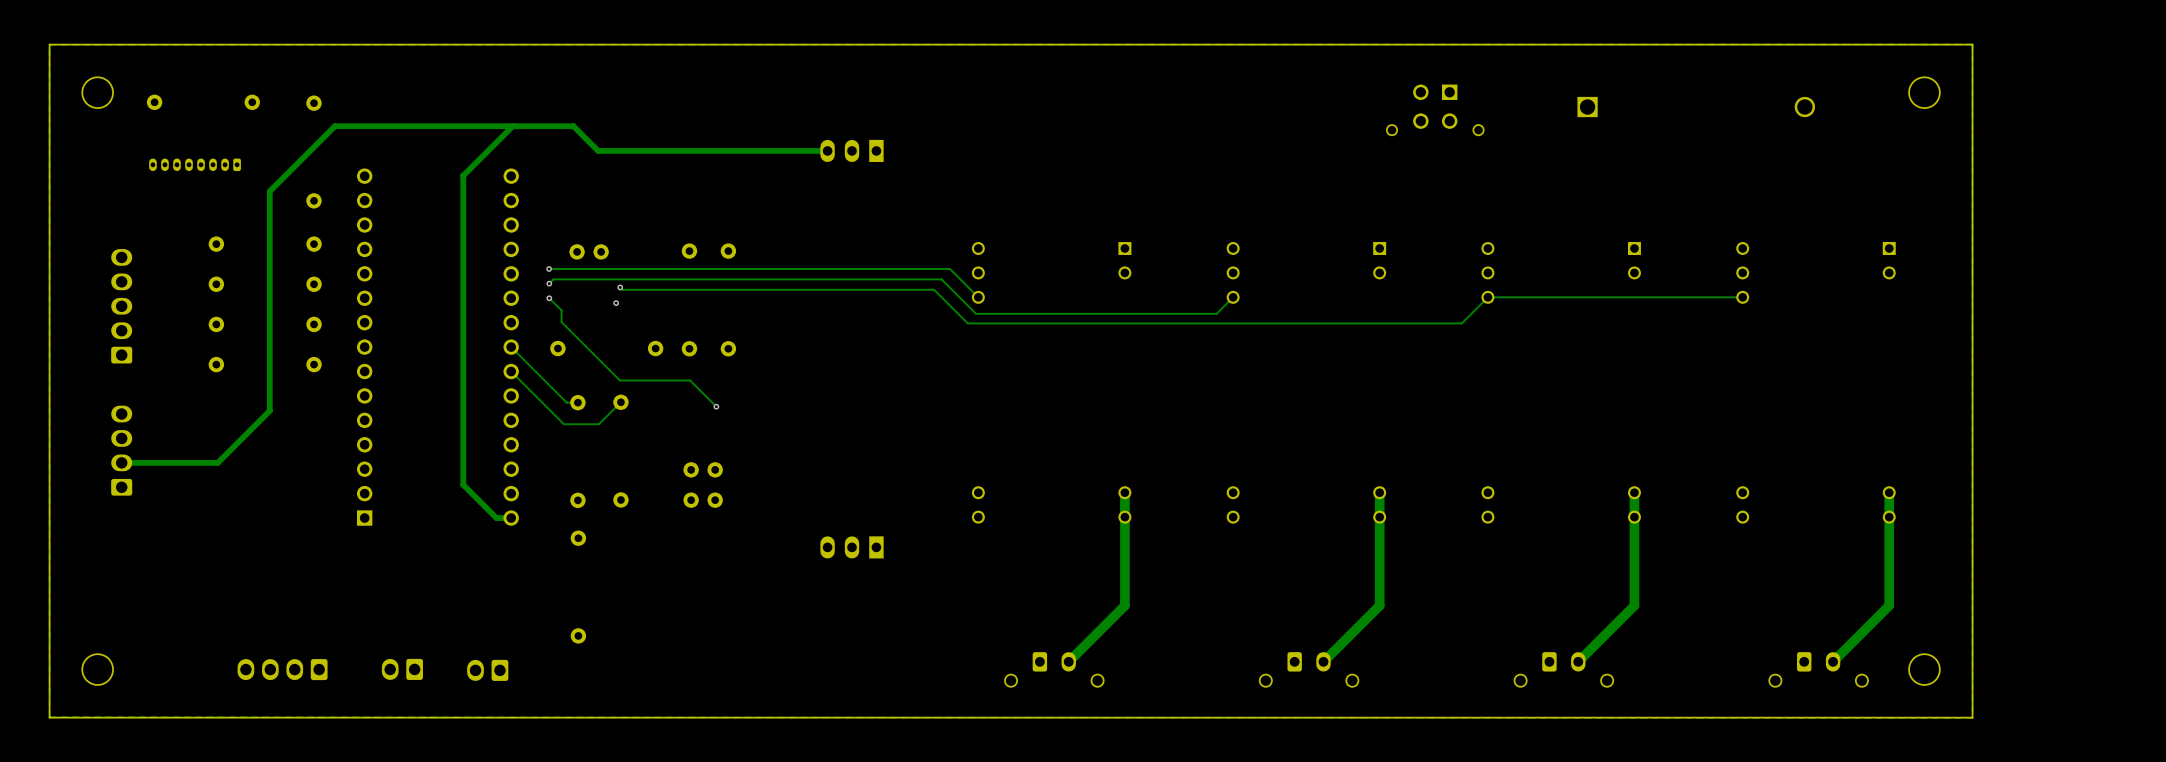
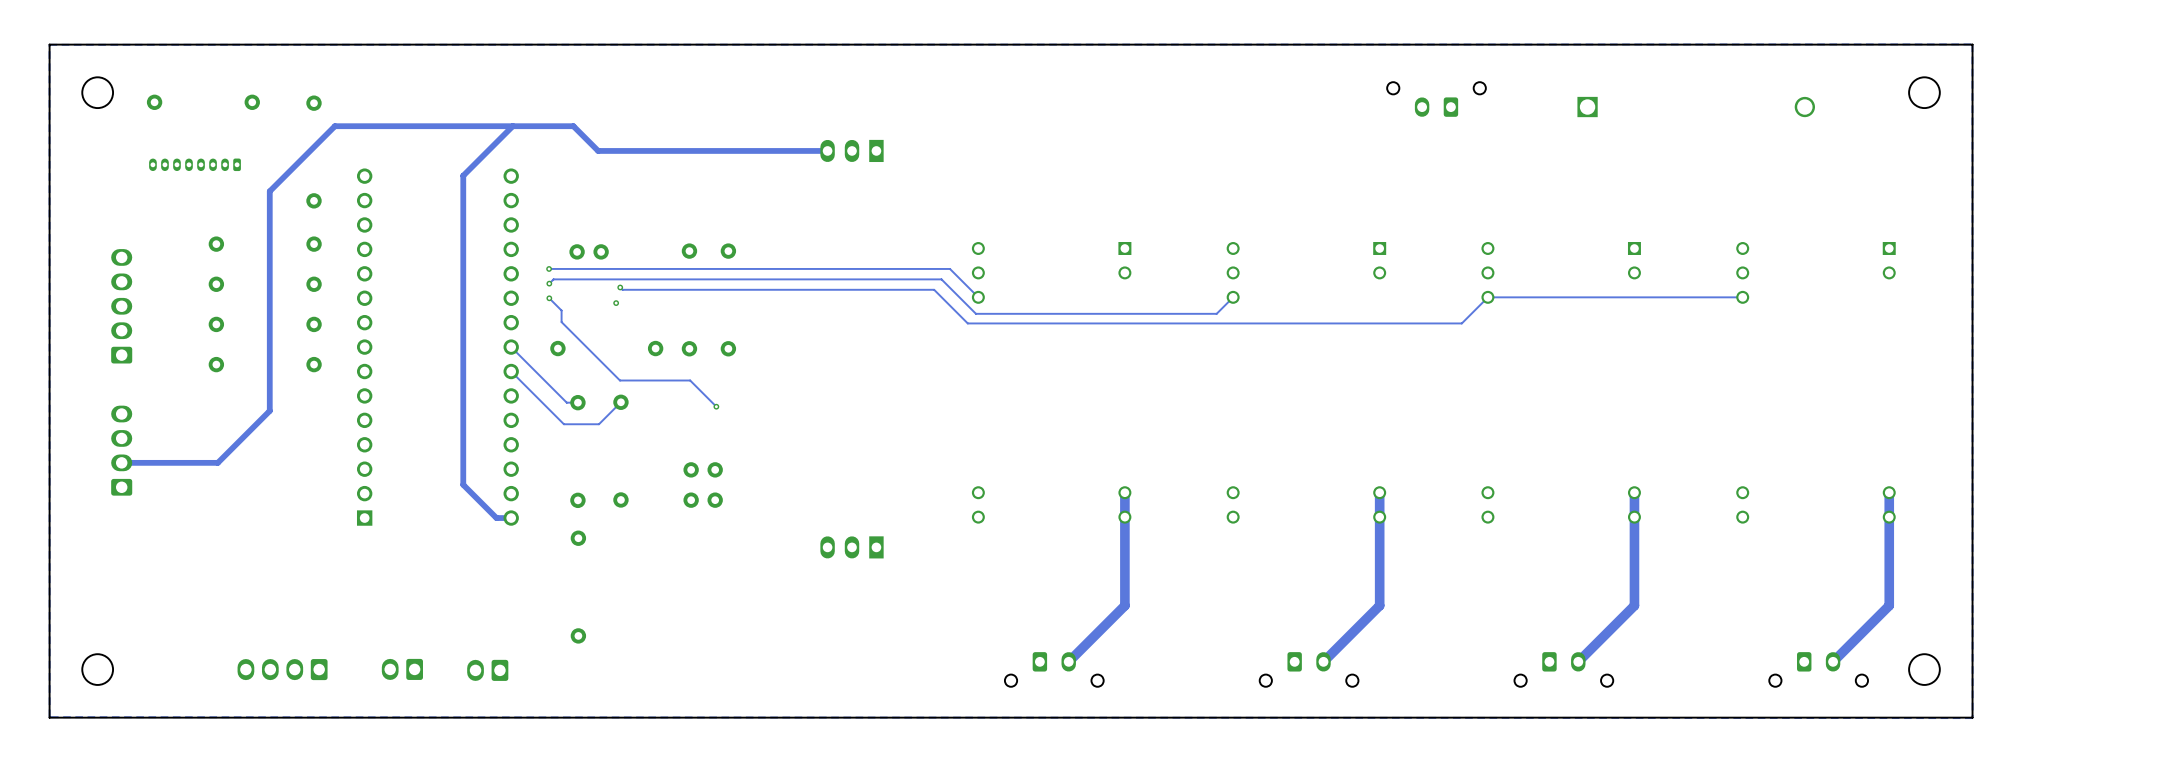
part: none -> (1436, 99)
part: (1435, 109) -> none

